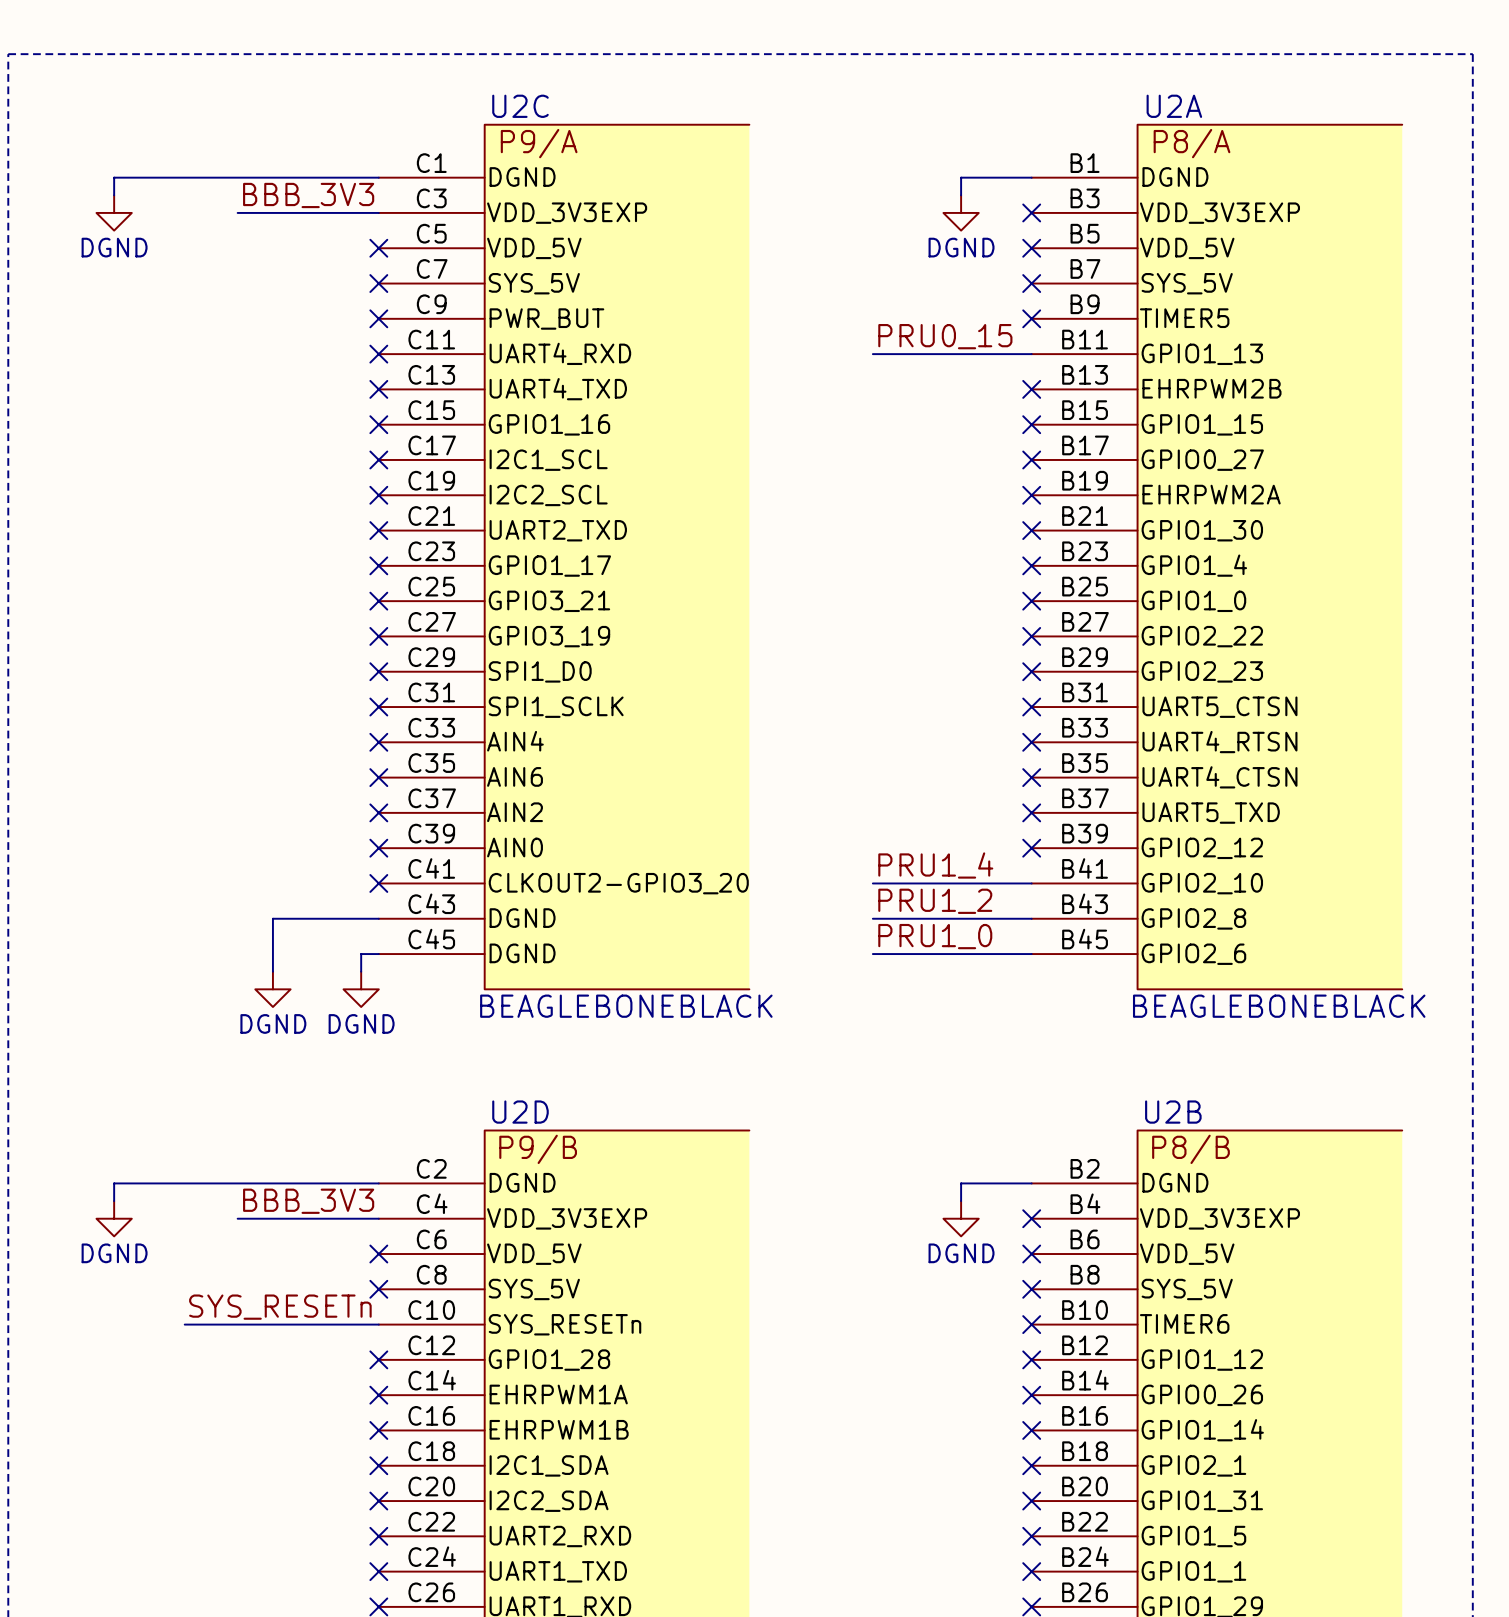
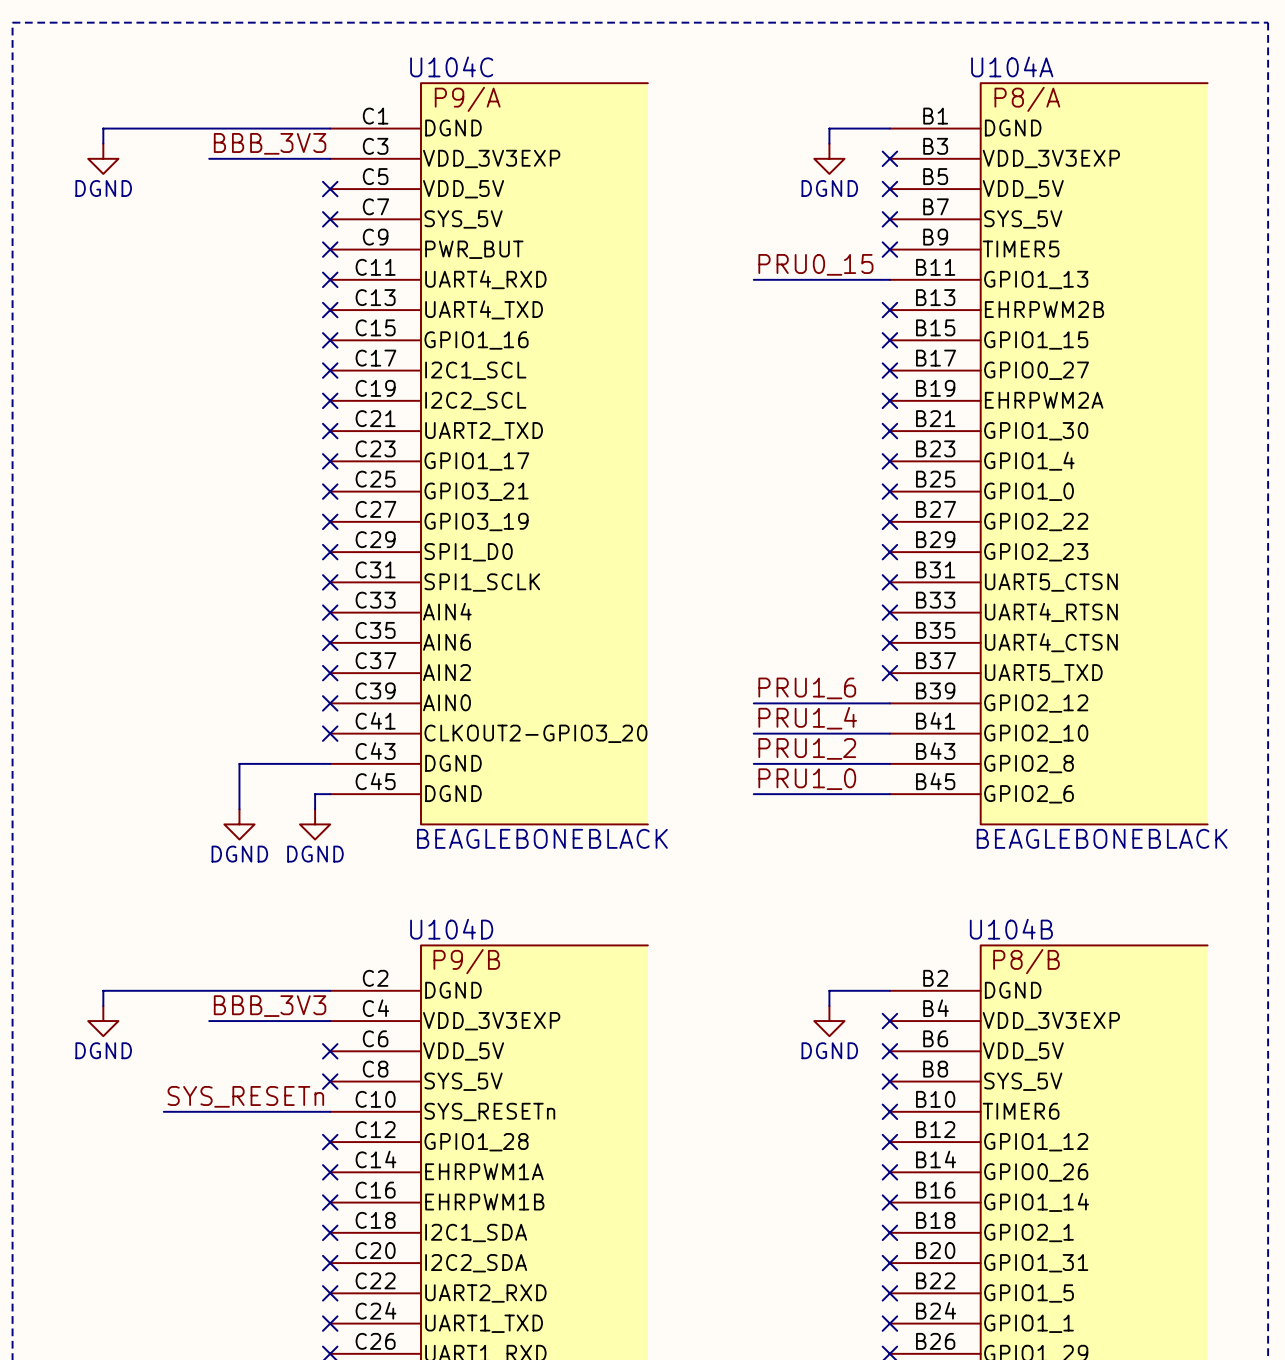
U2C name: U2C (520, 106) -> U104C (451, 66)
U2A name: U2A (1174, 106) -> U104A (1012, 66)
label: none -> PRU1_6 (807, 688)
wire: none -> (753, 703) (889, 703)
no-connect mark: (1031, 848) -> none
U2D name: U2D (520, 1112) -> U104D (451, 929)
U2B name: U2B (1173, 1112) -> U104B (1011, 929)

